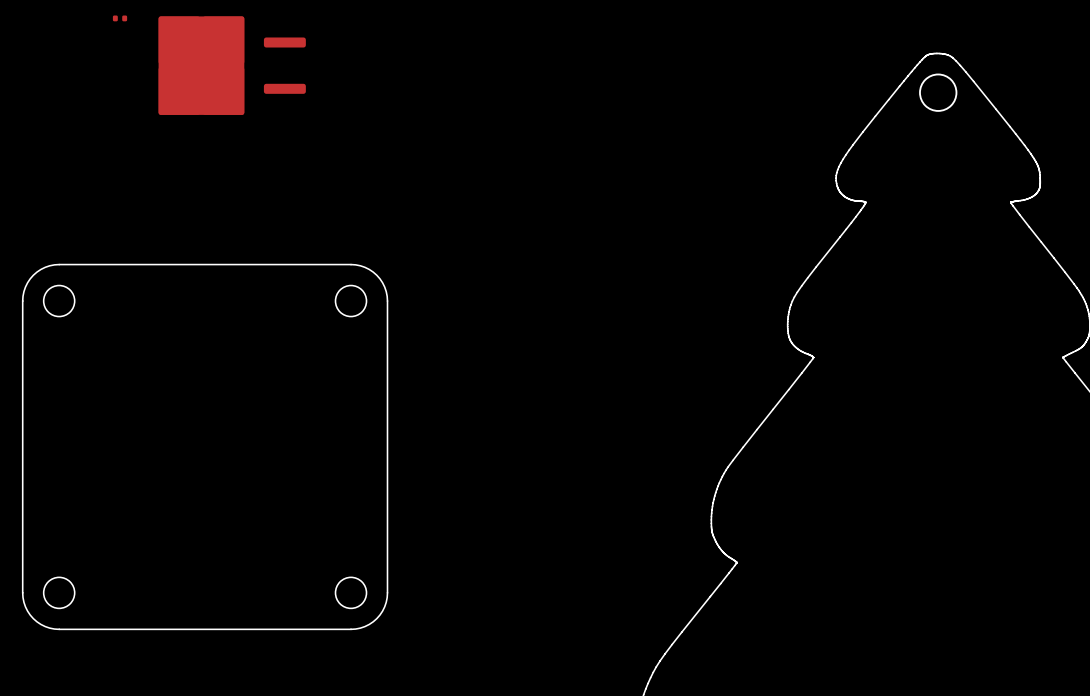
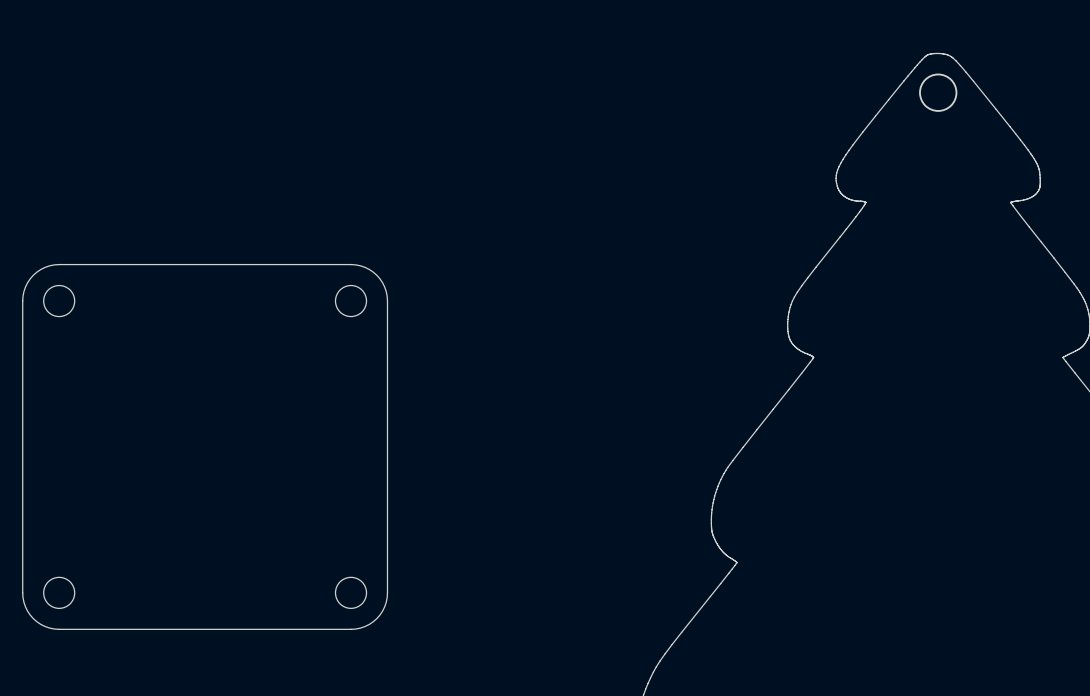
part: (120, 18) -> none
part: (232, 65) -> none

